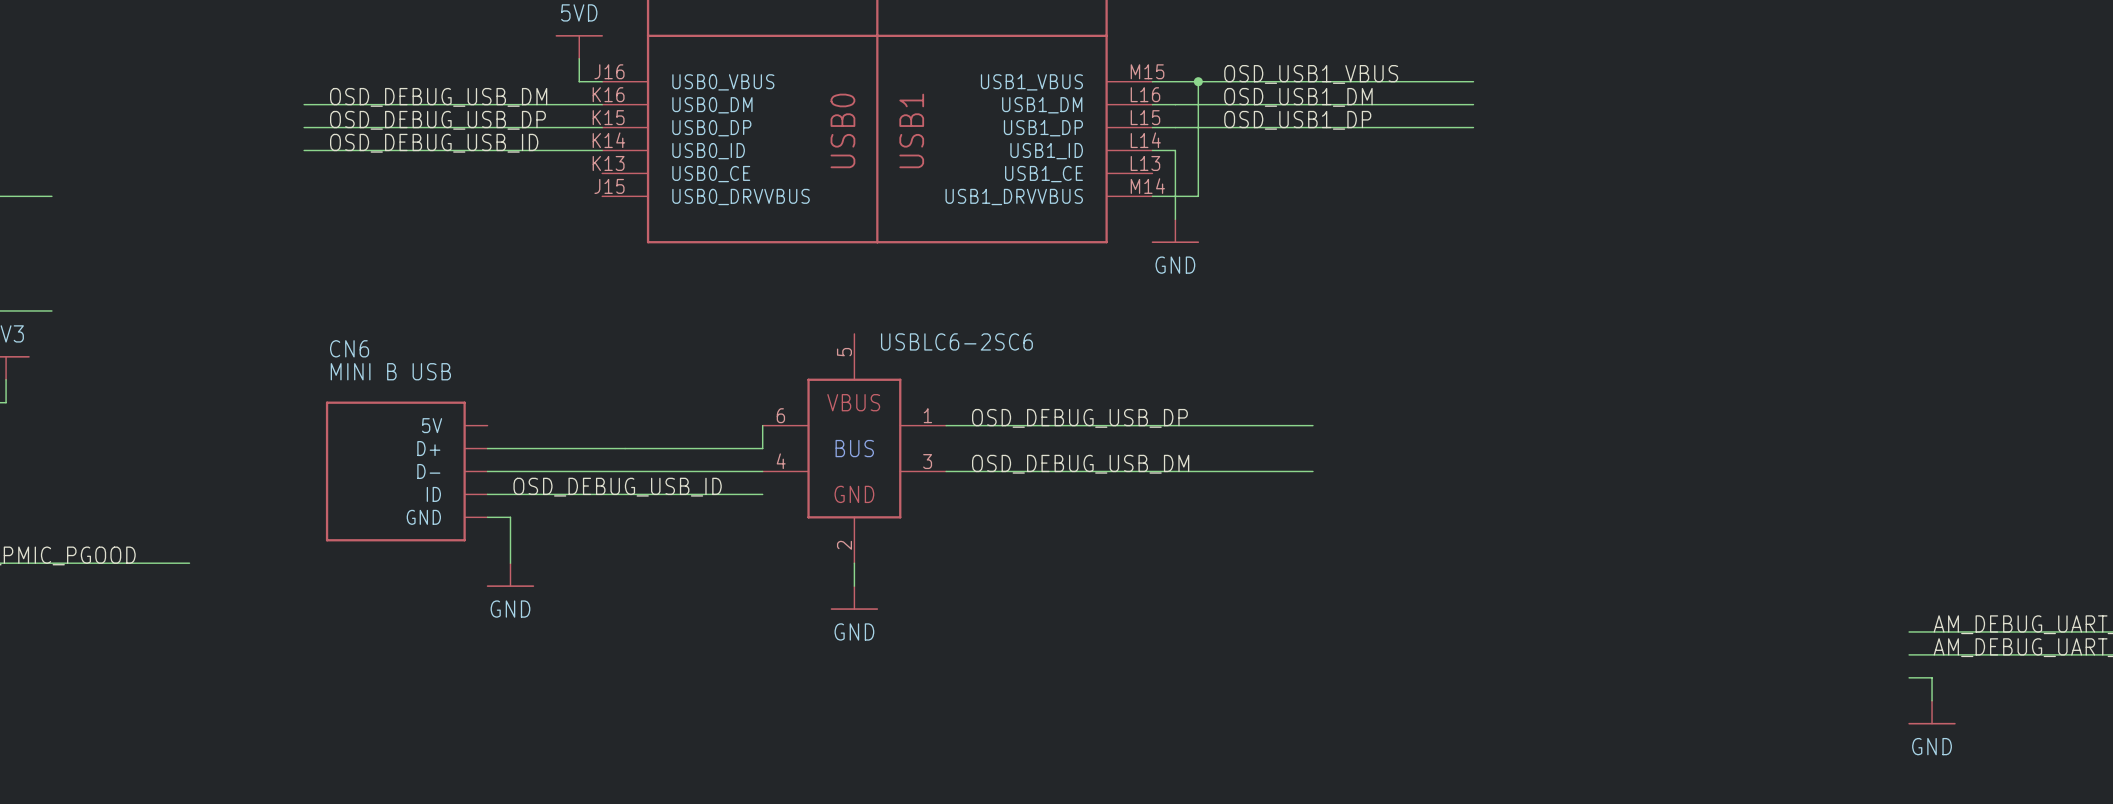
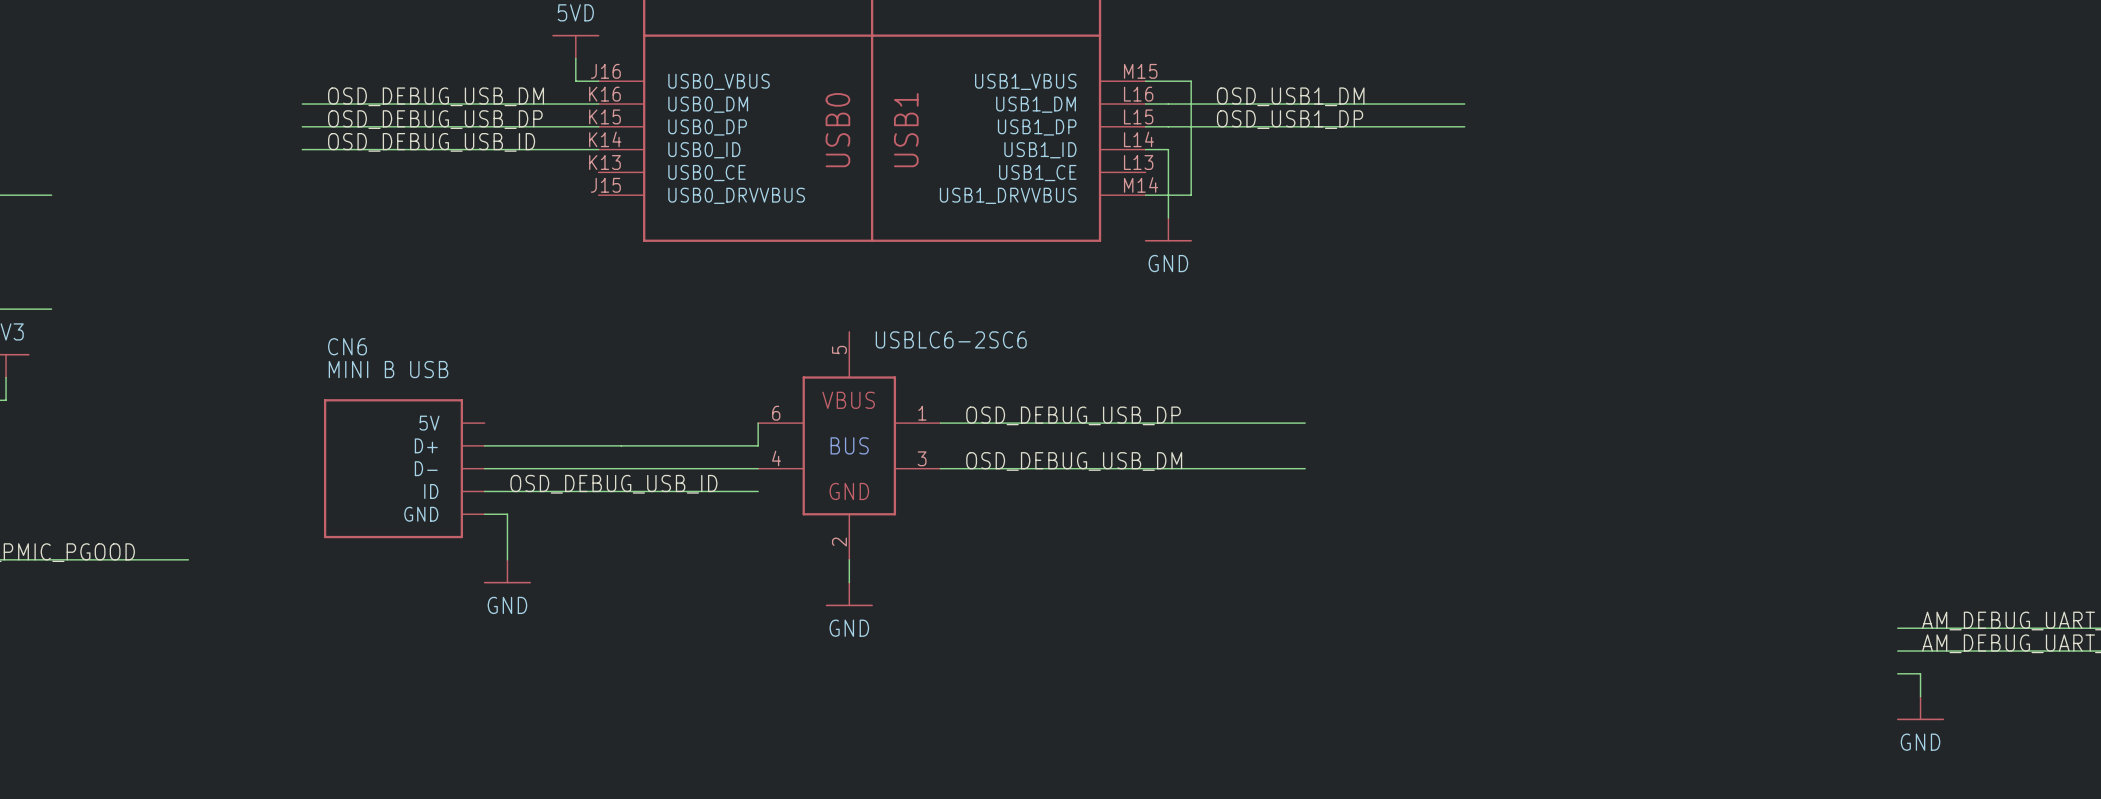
label: OSD_USB1_VBUS (1311, 74) -> none
wire: (1198, 81) (1473, 81) -> none
junction: (1198, 81) -> none

